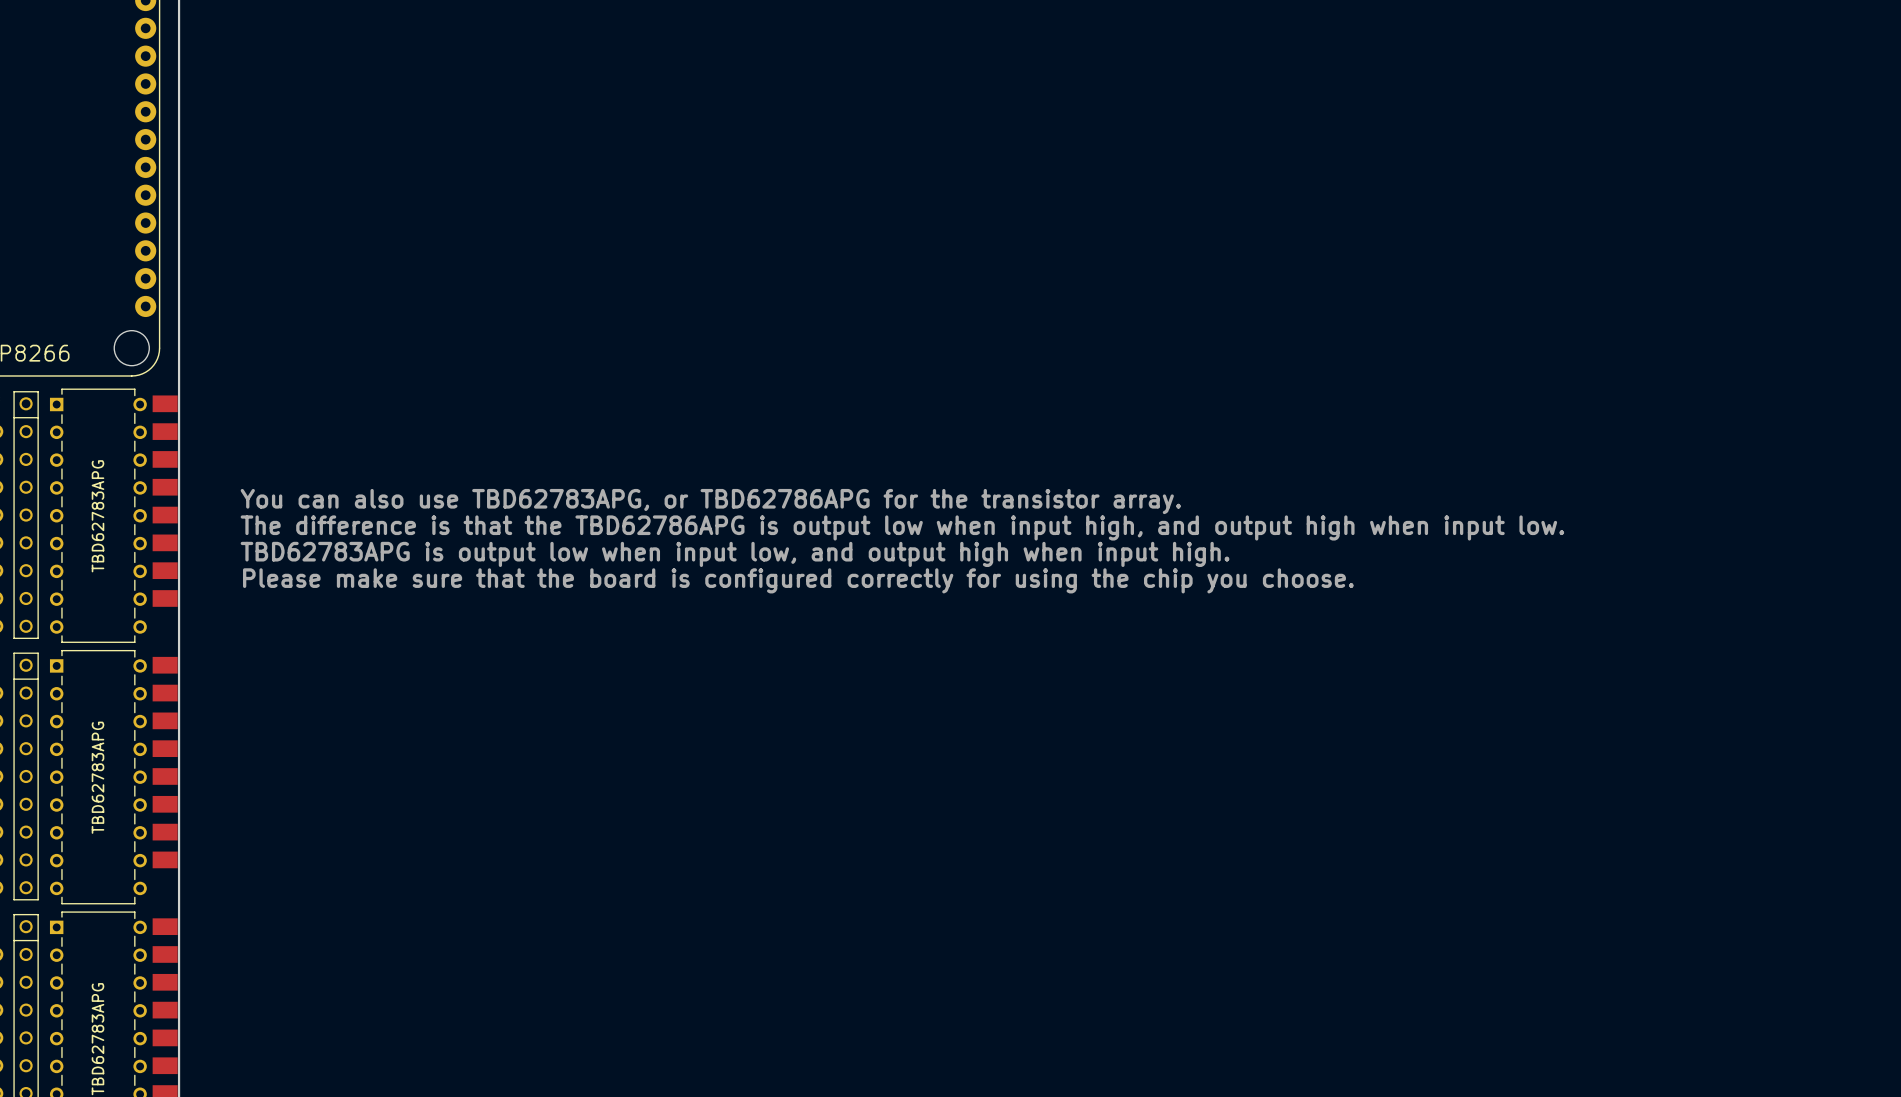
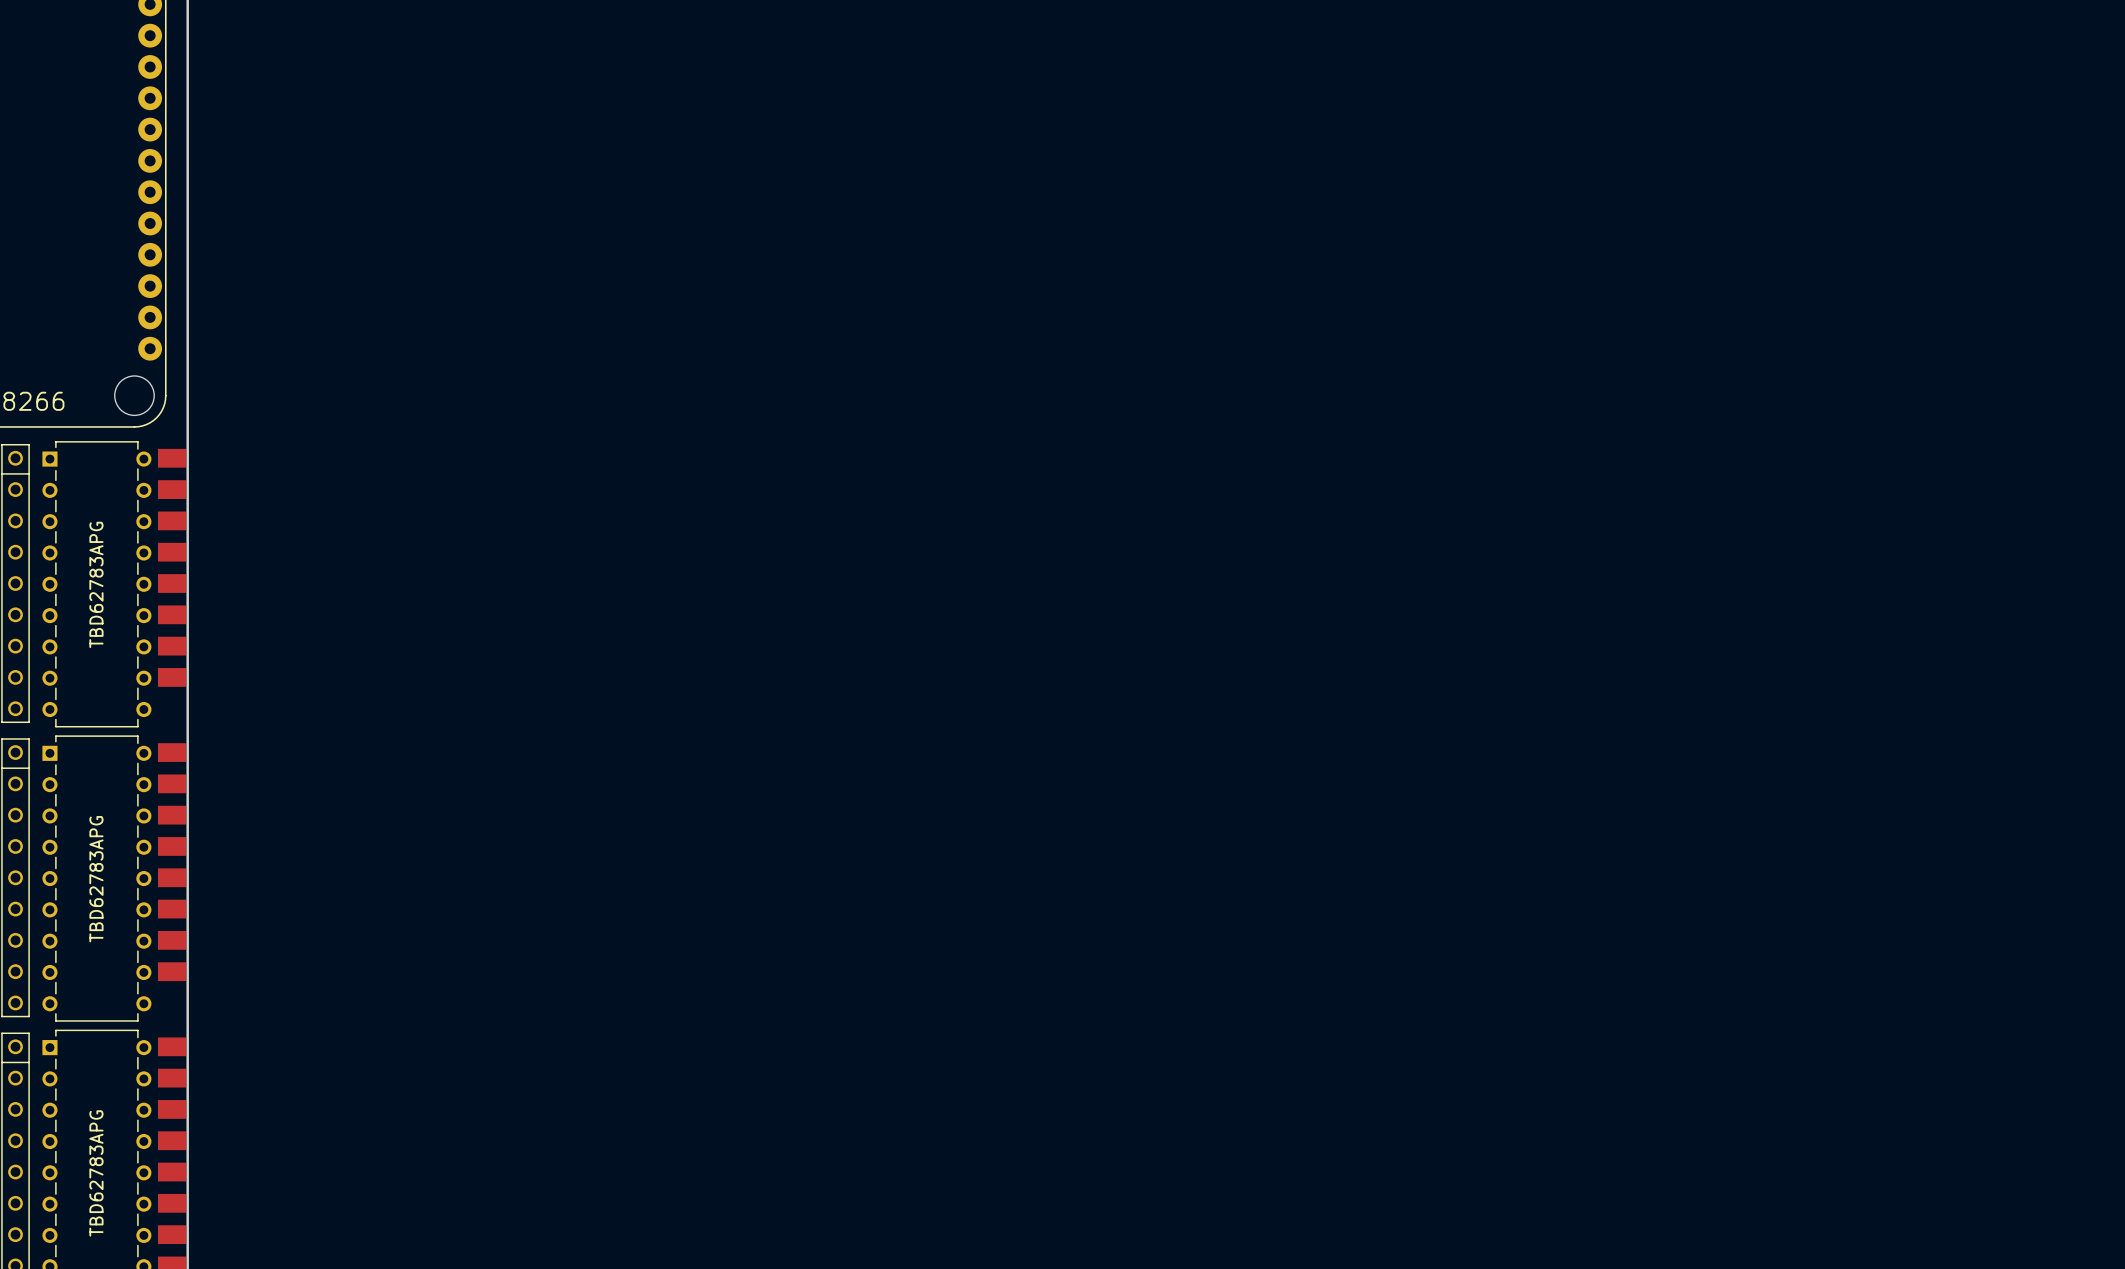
text: You can also use TBD62783APG, or TBD62786APG for the transistor array. (710, 501) -> none
text: The difference is that the TBD62786APG is output low when input high, and output high when input low. (902, 527) -> none
text: TBD62783APG is output low when input low, and output high when input high. (735, 554) -> none
text: Please make sure that the board is configured correctly for using the chip you choose. (798, 580) -> none

